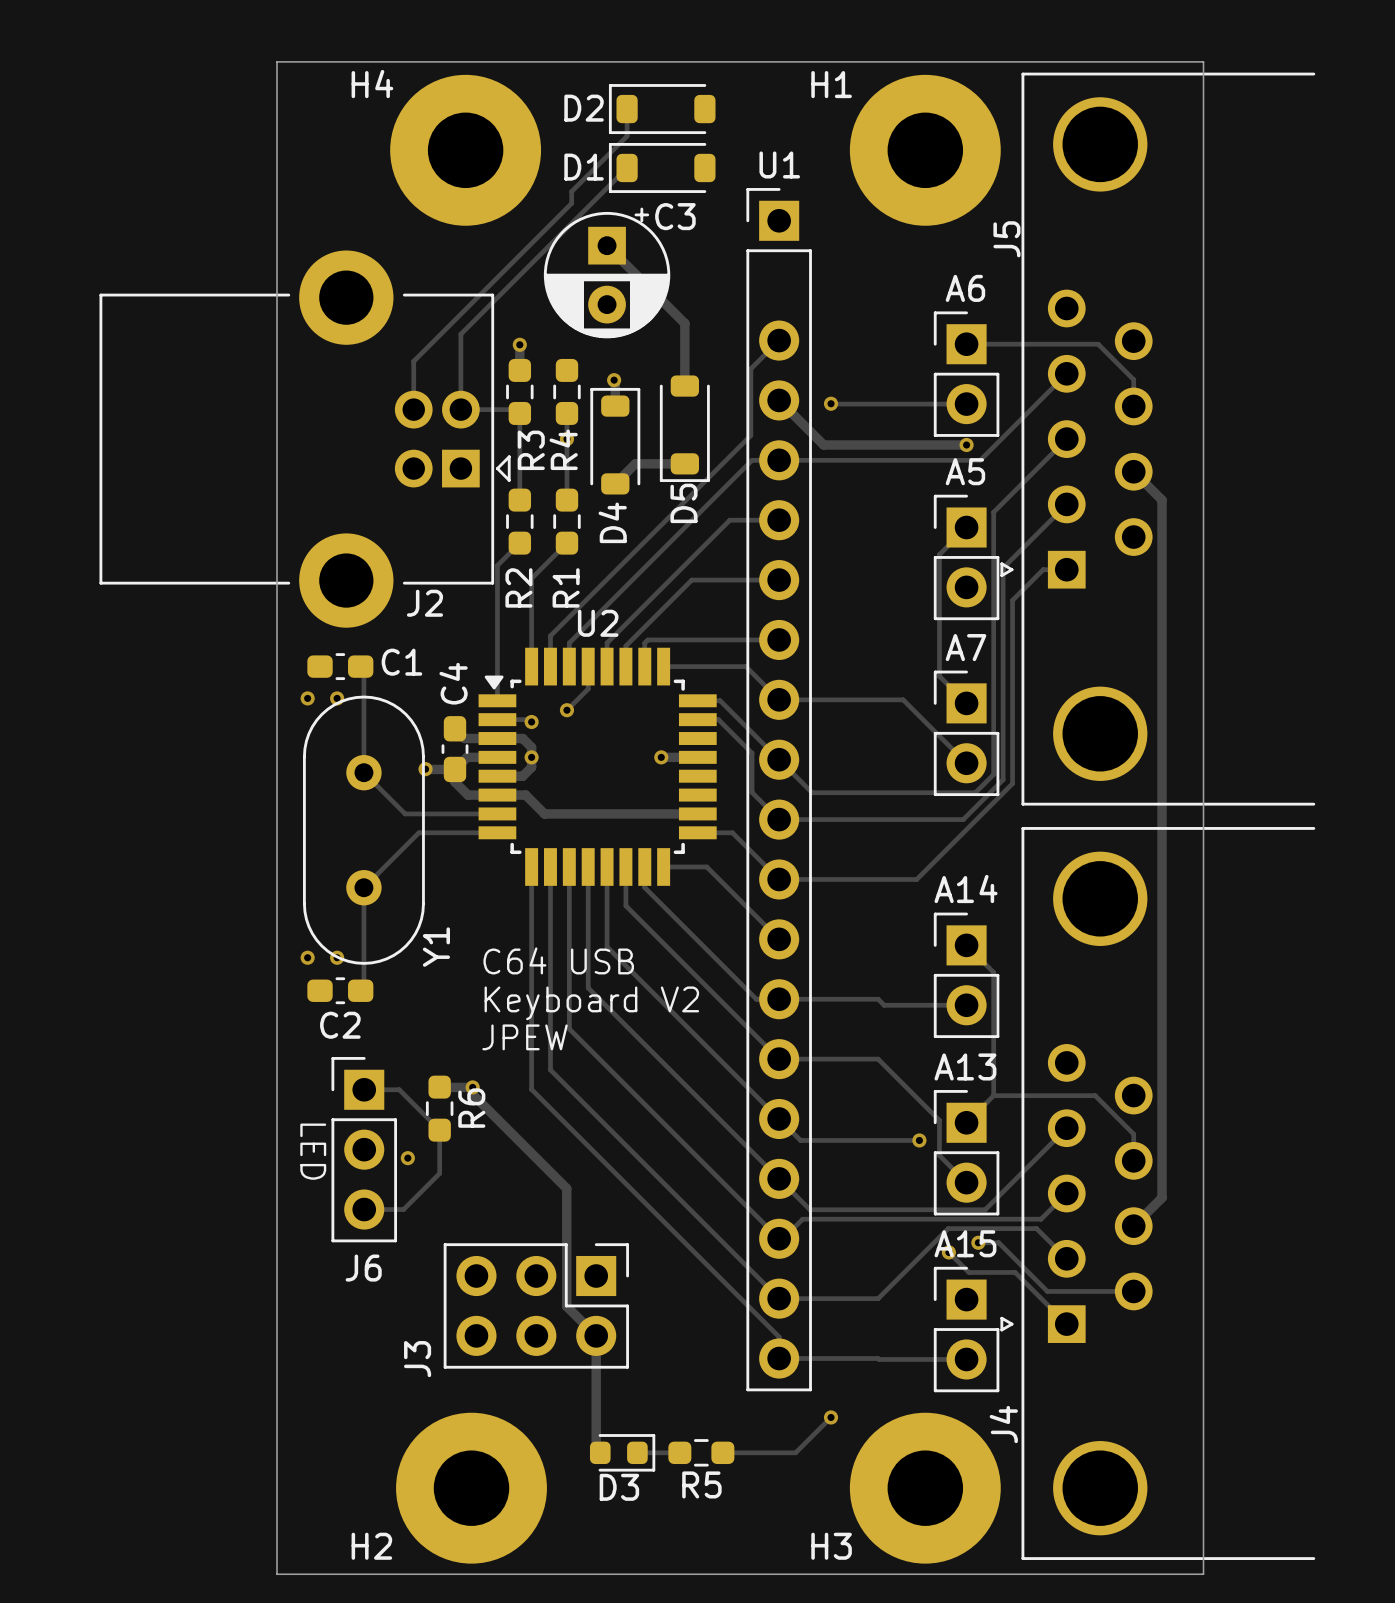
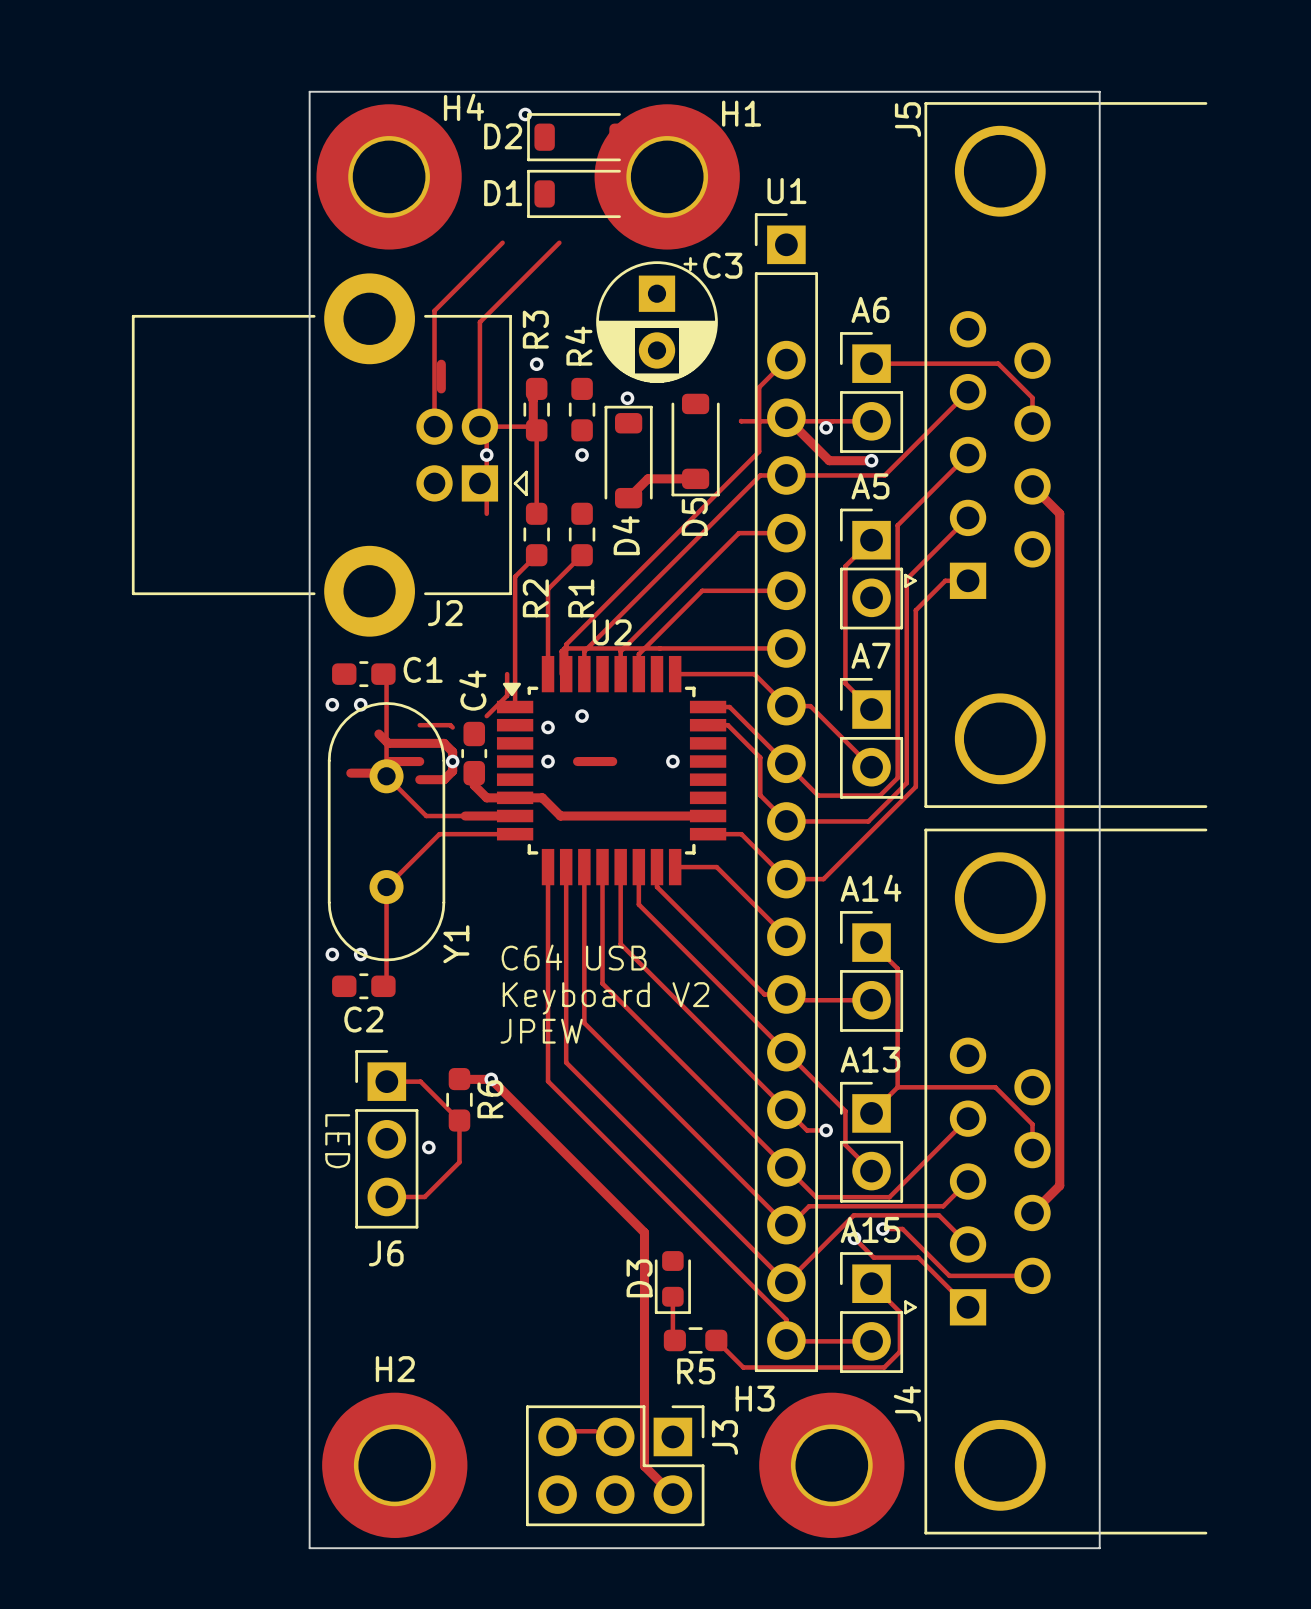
board edge: (383, 61) (277, 61) (277, 1574) (383, 1574) -> (309, 91) (309, 1548)
H4 name position: H4 (372, 84) -> H4 (463, 107)
via: none -> (525, 114)
track: (627, 109) (627, 136) (571, 191) (571, 203) (413, 361) (413, 409) -> none
H1 position: (925, 150) -> (667, 176)
track: (627, 167) (460, 334) (460, 409) (516, 409) (519, 413) (519, 500) -> none
track: none -> (502, 242) (434, 310) (434, 426)
track: none -> (559, 242) (479, 322) (479, 426) (532, 426) (536, 430) (536, 513)
J5 name position: J5 (1006, 239) -> J5 (907, 119)
track: (607, 245) (684, 323) (684, 386) -> none
C3 position: (607, 272) -> (657, 320)
track: (779, 340) (750, 368) (750, 435) (550, 635) (550, 666) -> (786, 360) (759, 387) (759, 451) (566, 644) (566, 674)
via: (519, 344) -> none
via position: (614, 380) -> (536, 364)
via: none -> (627, 398)
R3 position: (519, 391) -> (536, 409)
R4 position: (566, 391) -> (582, 409)
track: (779, 400) (823, 444) (922, 444) -> (786, 417) (829, 460)
via: (831, 403) -> none
via: none -> (826, 427)
D5 position: (684, 428) -> (695, 445)
J2 position: (305, 439) -> (329, 455)
via: none -> (582, 455)
D4 position: (615, 441) -> (628, 457)
R4 name position: R4 (563, 449) -> R4 (578, 346)
R3 name position: R3 (531, 450) -> R3 (535, 329)
track: (851, 460) (752, 460) (569, 643) (569, 666) -> (760, 475) (584, 651) (584, 674)
track: (684, 463) (635, 463) (615, 483) -> (695, 478) (647, 478) (628, 498)
track: (779, 520) (729, 520) (607, 643) (607, 666) -> (786, 533) (738, 533) (620, 651) (620, 674)
R2 position: (519, 521) -> (536, 534)
R1 position: (566, 521) -> (582, 534)
track: (519, 543) (497, 565) (497, 700) -> (536, 555) (515, 576) (515, 707)
track: (566, 543) (531, 578) (531, 666) -> (582, 555) (548, 589) (548, 674)
track: (779, 580) (691, 580) (625, 645) (625, 666) -> (786, 590) (702, 590) (638, 654) (638, 674)
track: none -> (691, 648) (786, 648)
C1 position: (340, 666) -> (363, 674)
track: (360, 666) (363, 669) (363, 772) (405, 813) (497, 813) -> none
track: (663, 666) (745, 666) (779, 699) (878, 699) -> (675, 674) (754, 674) (786, 706)
via: (307, 698) -> none
via: (337, 698) -> none
via: none -> (332, 704)
via: none -> (360, 704)
track: (697, 700) (720, 700) (812, 792) (911, 792) -> (708, 707) (729, 707) (818, 795)
via: (566, 710) -> none
via: none -> (582, 716)
track: (697, 719) (718, 719) (752, 753) (752, 792) (779, 819) (878, 819) -> (708, 725) (727, 725) (760, 757) (760, 795) (786, 821)
via: (531, 722) -> none
via: none -> (548, 727)
C4 position: (455, 749) -> (474, 753)
via: none -> (548, 761)
via: (661, 757) -> none
via: none -> (672, 761)
U2 position: (597, 766) -> (611, 770)
via: (425, 769) -> none
track: (455, 769) (455, 782) (467, 795) (525, 795) (544, 813) -> (383, 674) (386, 677) (386, 776) (426, 816) (465, 816)
U1 position: (779, 789) -> (786, 792)
track: (596, 813) (643, 813) -> (474, 773) (474, 785) (486, 797) (542, 797) (560, 816)
track: none -> (612, 816) (708, 816)
Y1 position: (363, 830) -> (386, 831)
track: (497, 832) (418, 832) (363, 887) (363, 987) (360, 990) -> (515, 834) (439, 834) (386, 887) (386, 983) (383, 986)
track: (697, 832) (732, 832) (779, 879) (878, 879) -> (708, 834) (741, 834) (786, 879)
track: (531, 866) (531, 1089) (779, 1336) (779, 1358) -> none
track: (550, 866) (550, 1069) (779, 1298) (878, 1298) -> (566, 867) (566, 1062) (786, 1282)
track: (569, 866) (569, 1028) (779, 1238) (783, 1238) (802, 1219) (901, 1219) -> (584, 867) (584, 1023) (786, 1225) (790, 1225) (809, 1206)
track: (588, 866) (588, 987) (810, 1209) (909, 1209) -> (602, 867) (602, 983) (816, 1197)
track: (607, 866) (607, 946) (800, 1140) (899, 1140) -> (620, 867) (620, 944) (807, 1130)
track: (625, 866) (625, 905) (779, 1059) (878, 1059) -> (638, 867) (638, 904) (786, 1052)
track: (644, 866) (644, 887) (756, 999) (855, 999) -> (657, 867) (657, 886) (764, 994)
track: (663, 866) (706, 866) (779, 939) -> (675, 867) (716, 867) (786, 936)
via: (307, 957) -> none
via: (337, 957) -> none
via: none -> (332, 954)
via: none -> (360, 954)
text position: C64 USB (558, 960) -> C64 USB (574, 957)
C2 position: (340, 990) -> (363, 986)
text position: Keyboard V2 (591, 1003) -> Keyboard V2 (606, 998)
text position: JPEW (525, 1037) -> JPEW (541, 1031)
track: (439, 1087) (472, 1087) (472, 1094) (566, 1188) (566, 1306) (596, 1335) (596, 1448) (600, 1452) -> none
via: (472, 1087) -> none
track: none -> (459, 1079) (491, 1079) (644, 1232) (644, 1466) (672, 1494)
via: none -> (491, 1079)
track: (364, 1089) (399, 1089) (439, 1130) (439, 1173) (403, 1209) (364, 1209) -> (386, 1081) (420, 1081) (459, 1120) (459, 1162) (424, 1196) (386, 1196)
R6 position: (439, 1108) -> (459, 1099)
J6 position: (364, 1149) -> (386, 1139)
text position: LED (313, 1151) -> LED (337, 1141)
via: (407, 1158) -> none
via: none -> (428, 1147)
track: none -> (871, 1283) (899, 1312) (899, 1351) (884, 1367) (743, 1367) (716, 1340)
J3 position: (536, 1305) -> (615, 1465)
track: none -> (672, 1296) (672, 1338) (674, 1340)
track: (779, 1358) (878, 1358) -> (548, 867) (548, 1081) (786, 1319) (786, 1340)
J3 name position: J3 (417, 1359) -> J3 (724, 1437)
track: (831, 1417) (795, 1452) (722, 1452) -> none
via: (831, 1417) -> none
D3 rotation: 0° (622, 1452) -> 90° clockwise (672, 1282)
D3 position: (622, 1452) -> (672, 1282)
R5 position: (701, 1452) -> (695, 1340)
H2 name position: H2 (371, 1546) -> H2 (395, 1369)
H3 name position: H3 (831, 1546) -> H3 (755, 1398)

